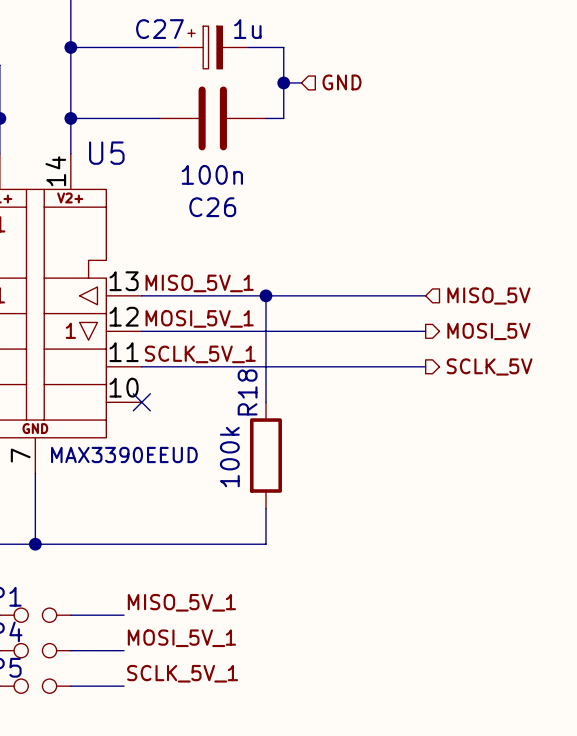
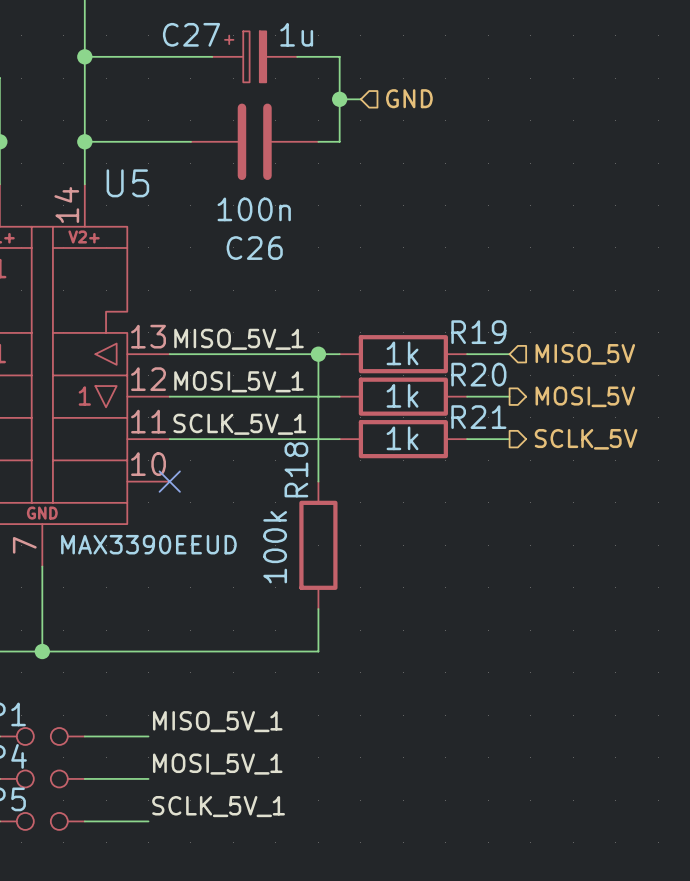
wire: (283, 295) (390, 295) -> none
R19: none -> 1k (403, 354)
wire: (283, 331) (390, 331) -> none
R20: none -> 1k (403, 396)
wire: (283, 366) (390, 366) -> none
R21: none -> 1k (403, 439)

